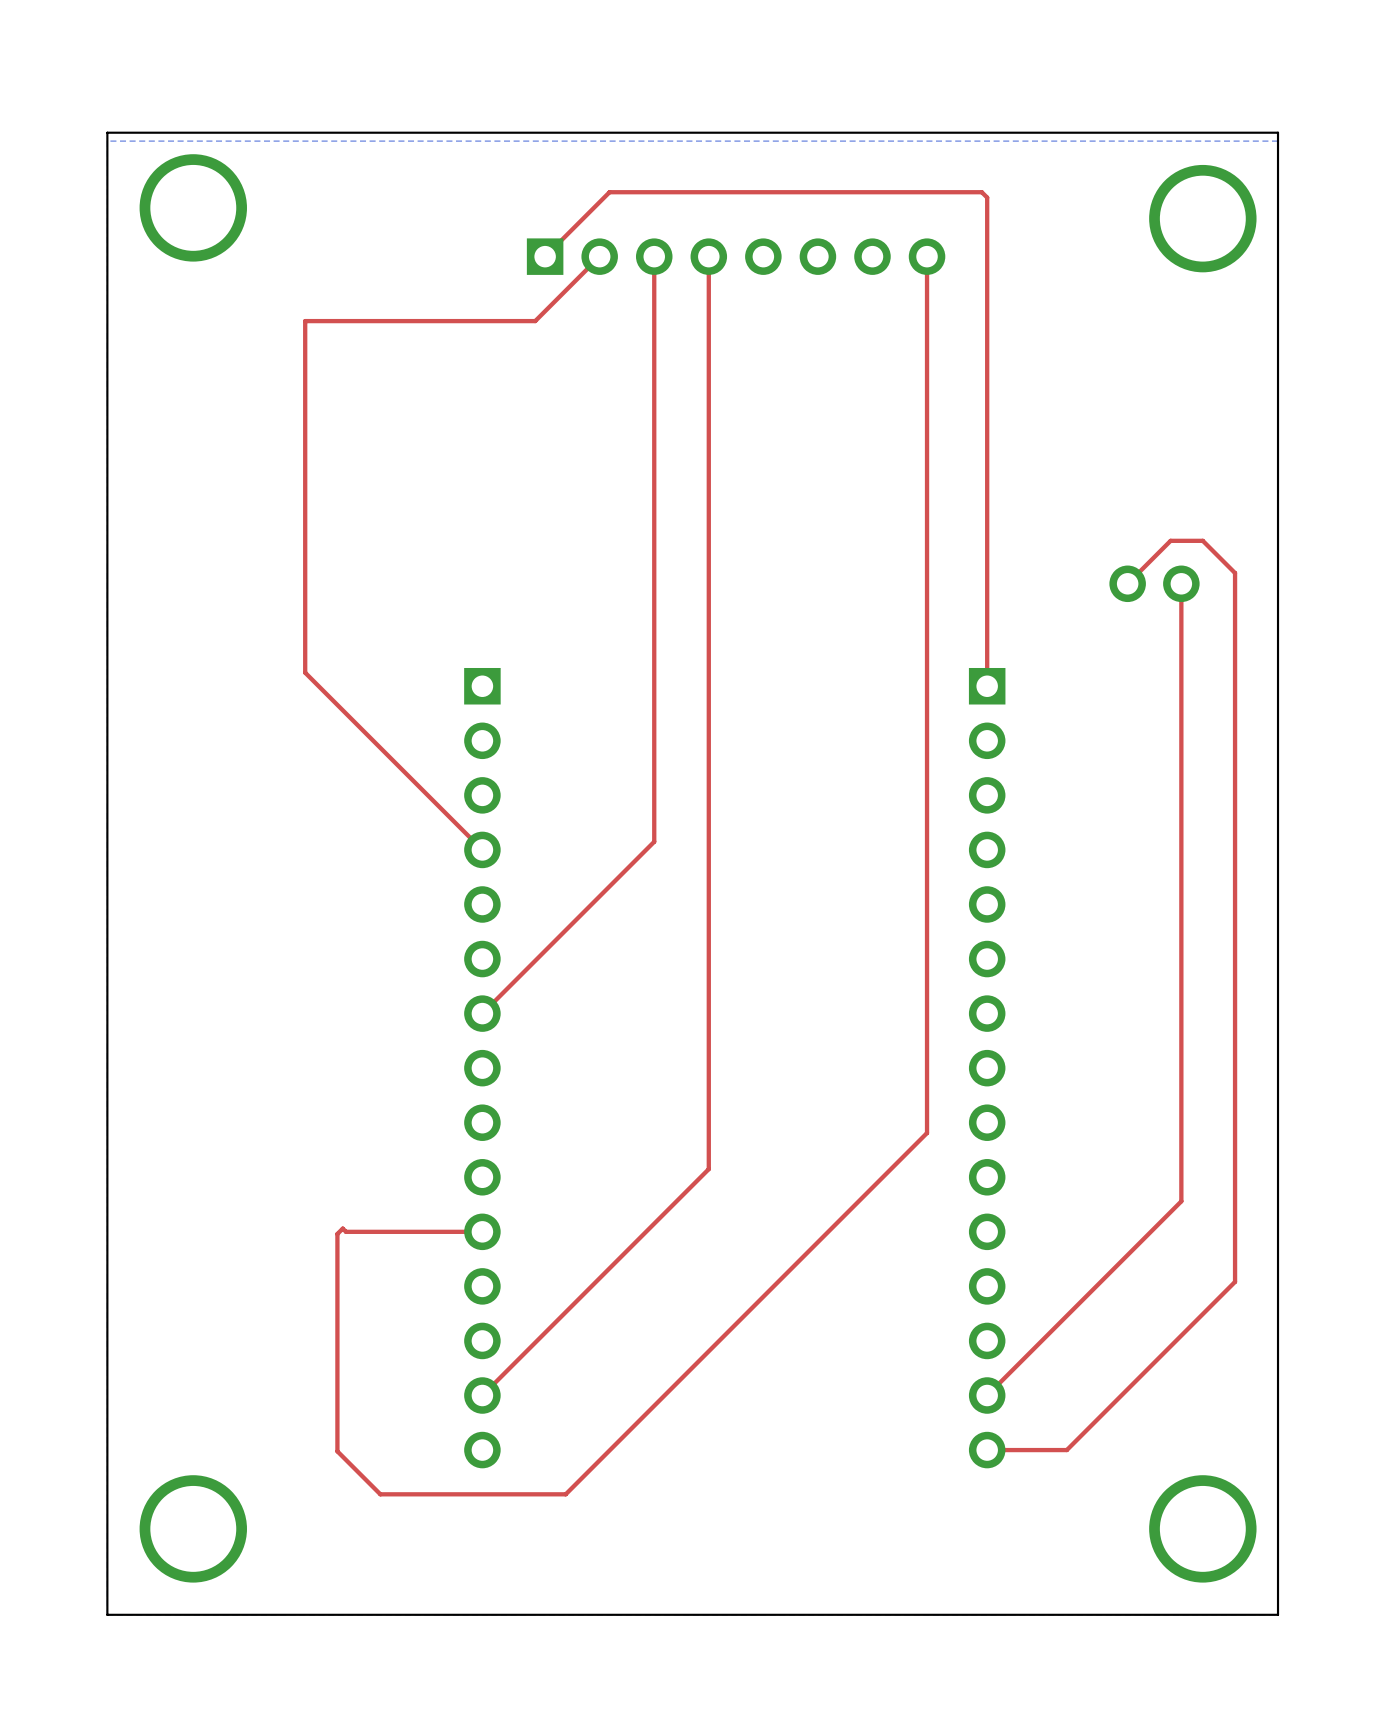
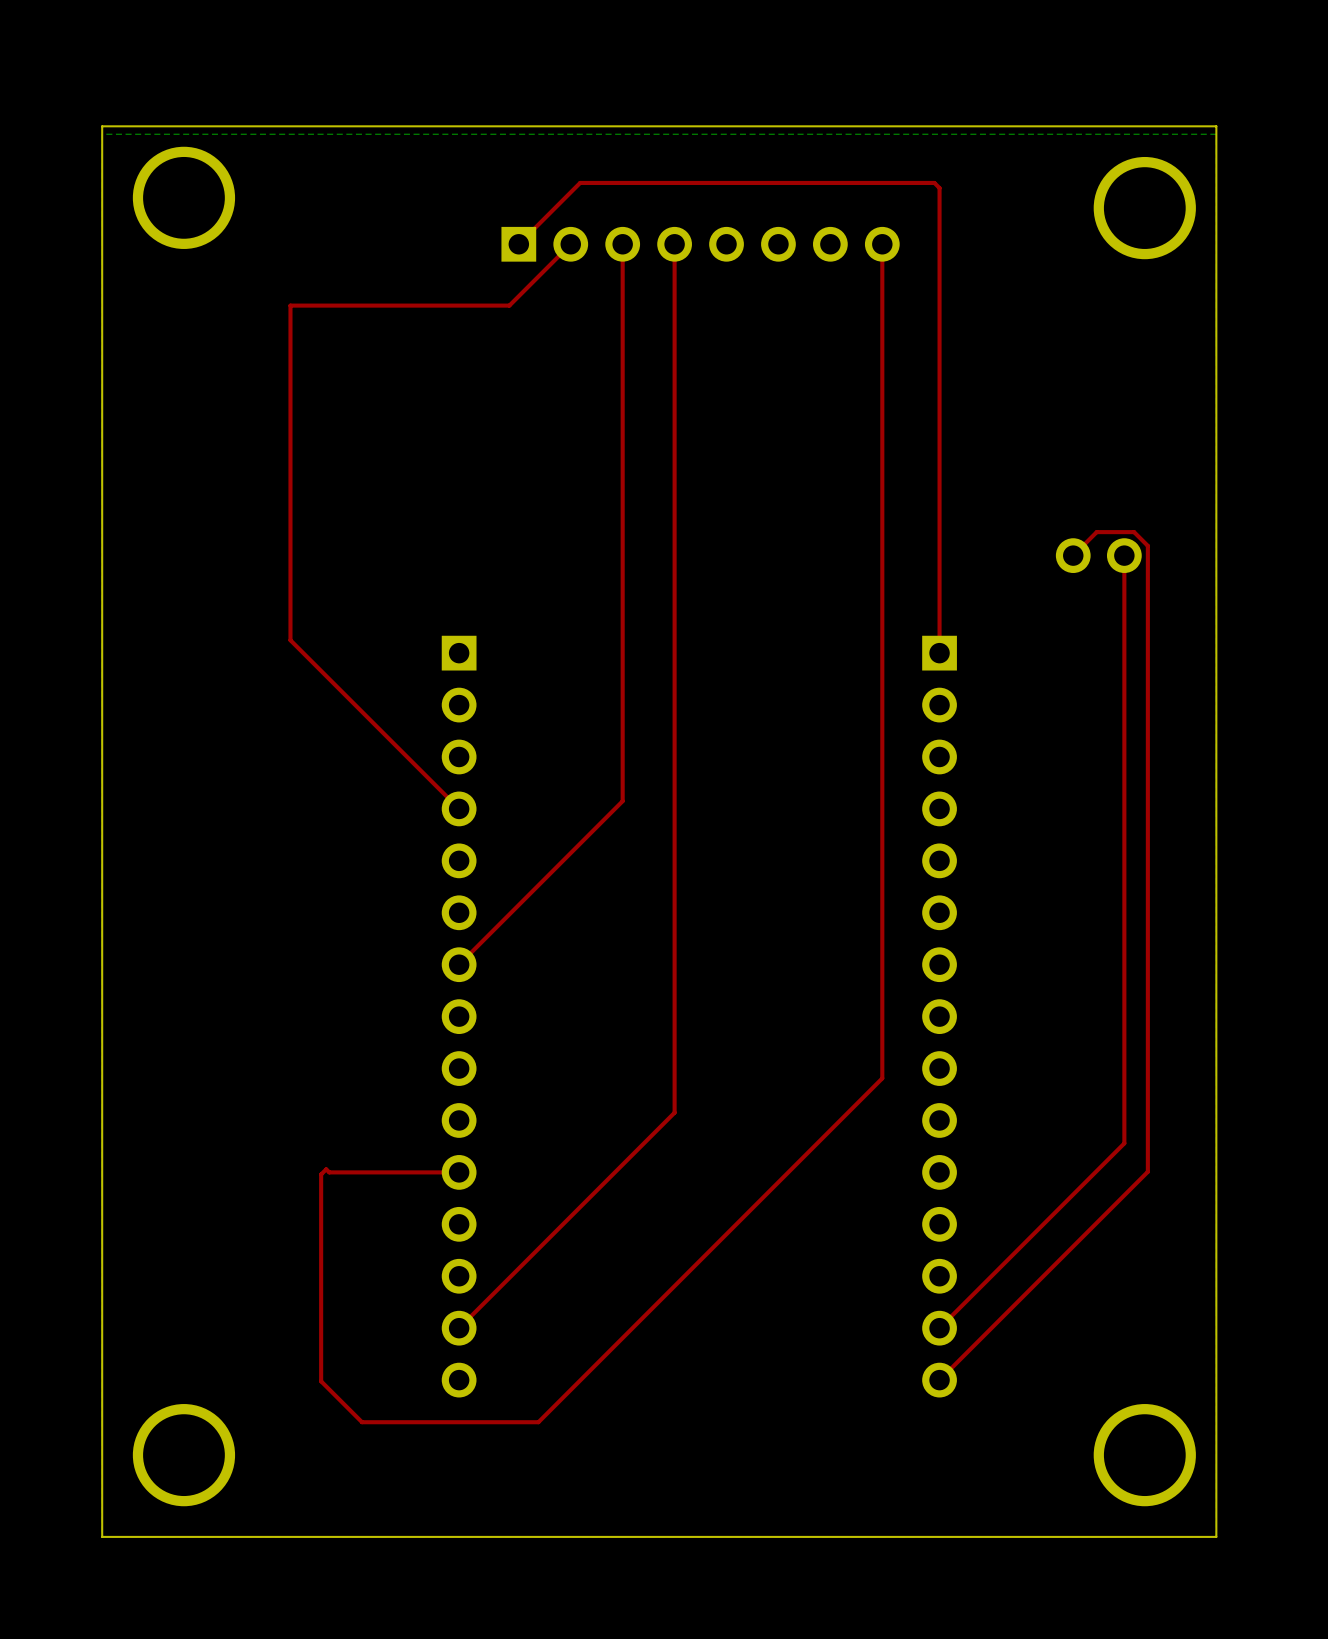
top track: (1152, 559) (1170, 540) (1202, 540) (1235, 573) (1235, 1281) (1066, 1450) (987, 1450) -> (1096, 532) (1134, 532) (1147, 545) (1147, 1171) (939, 1380)

